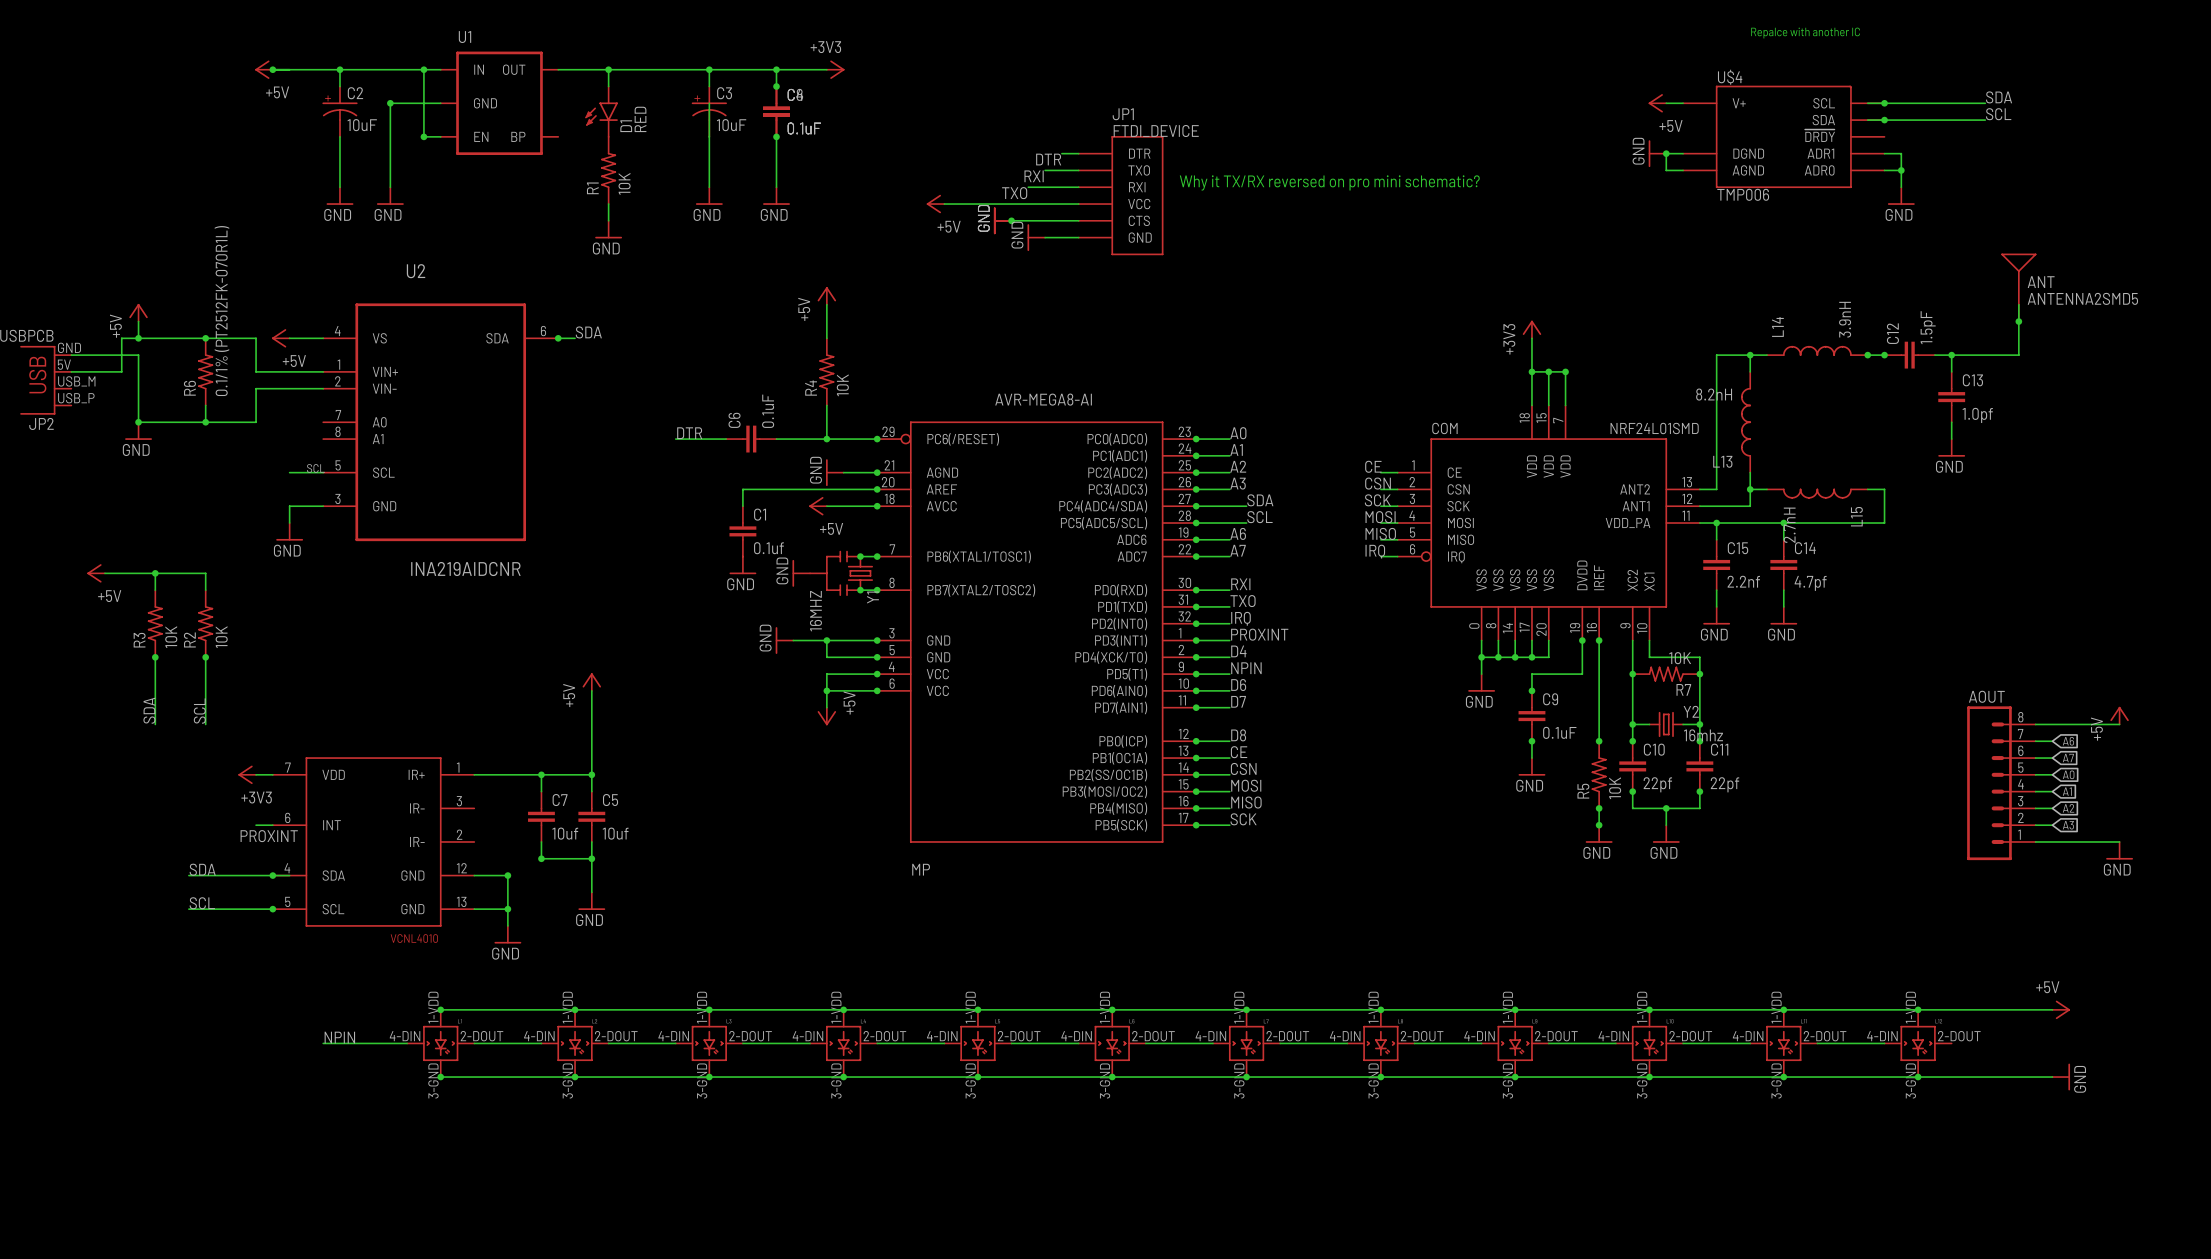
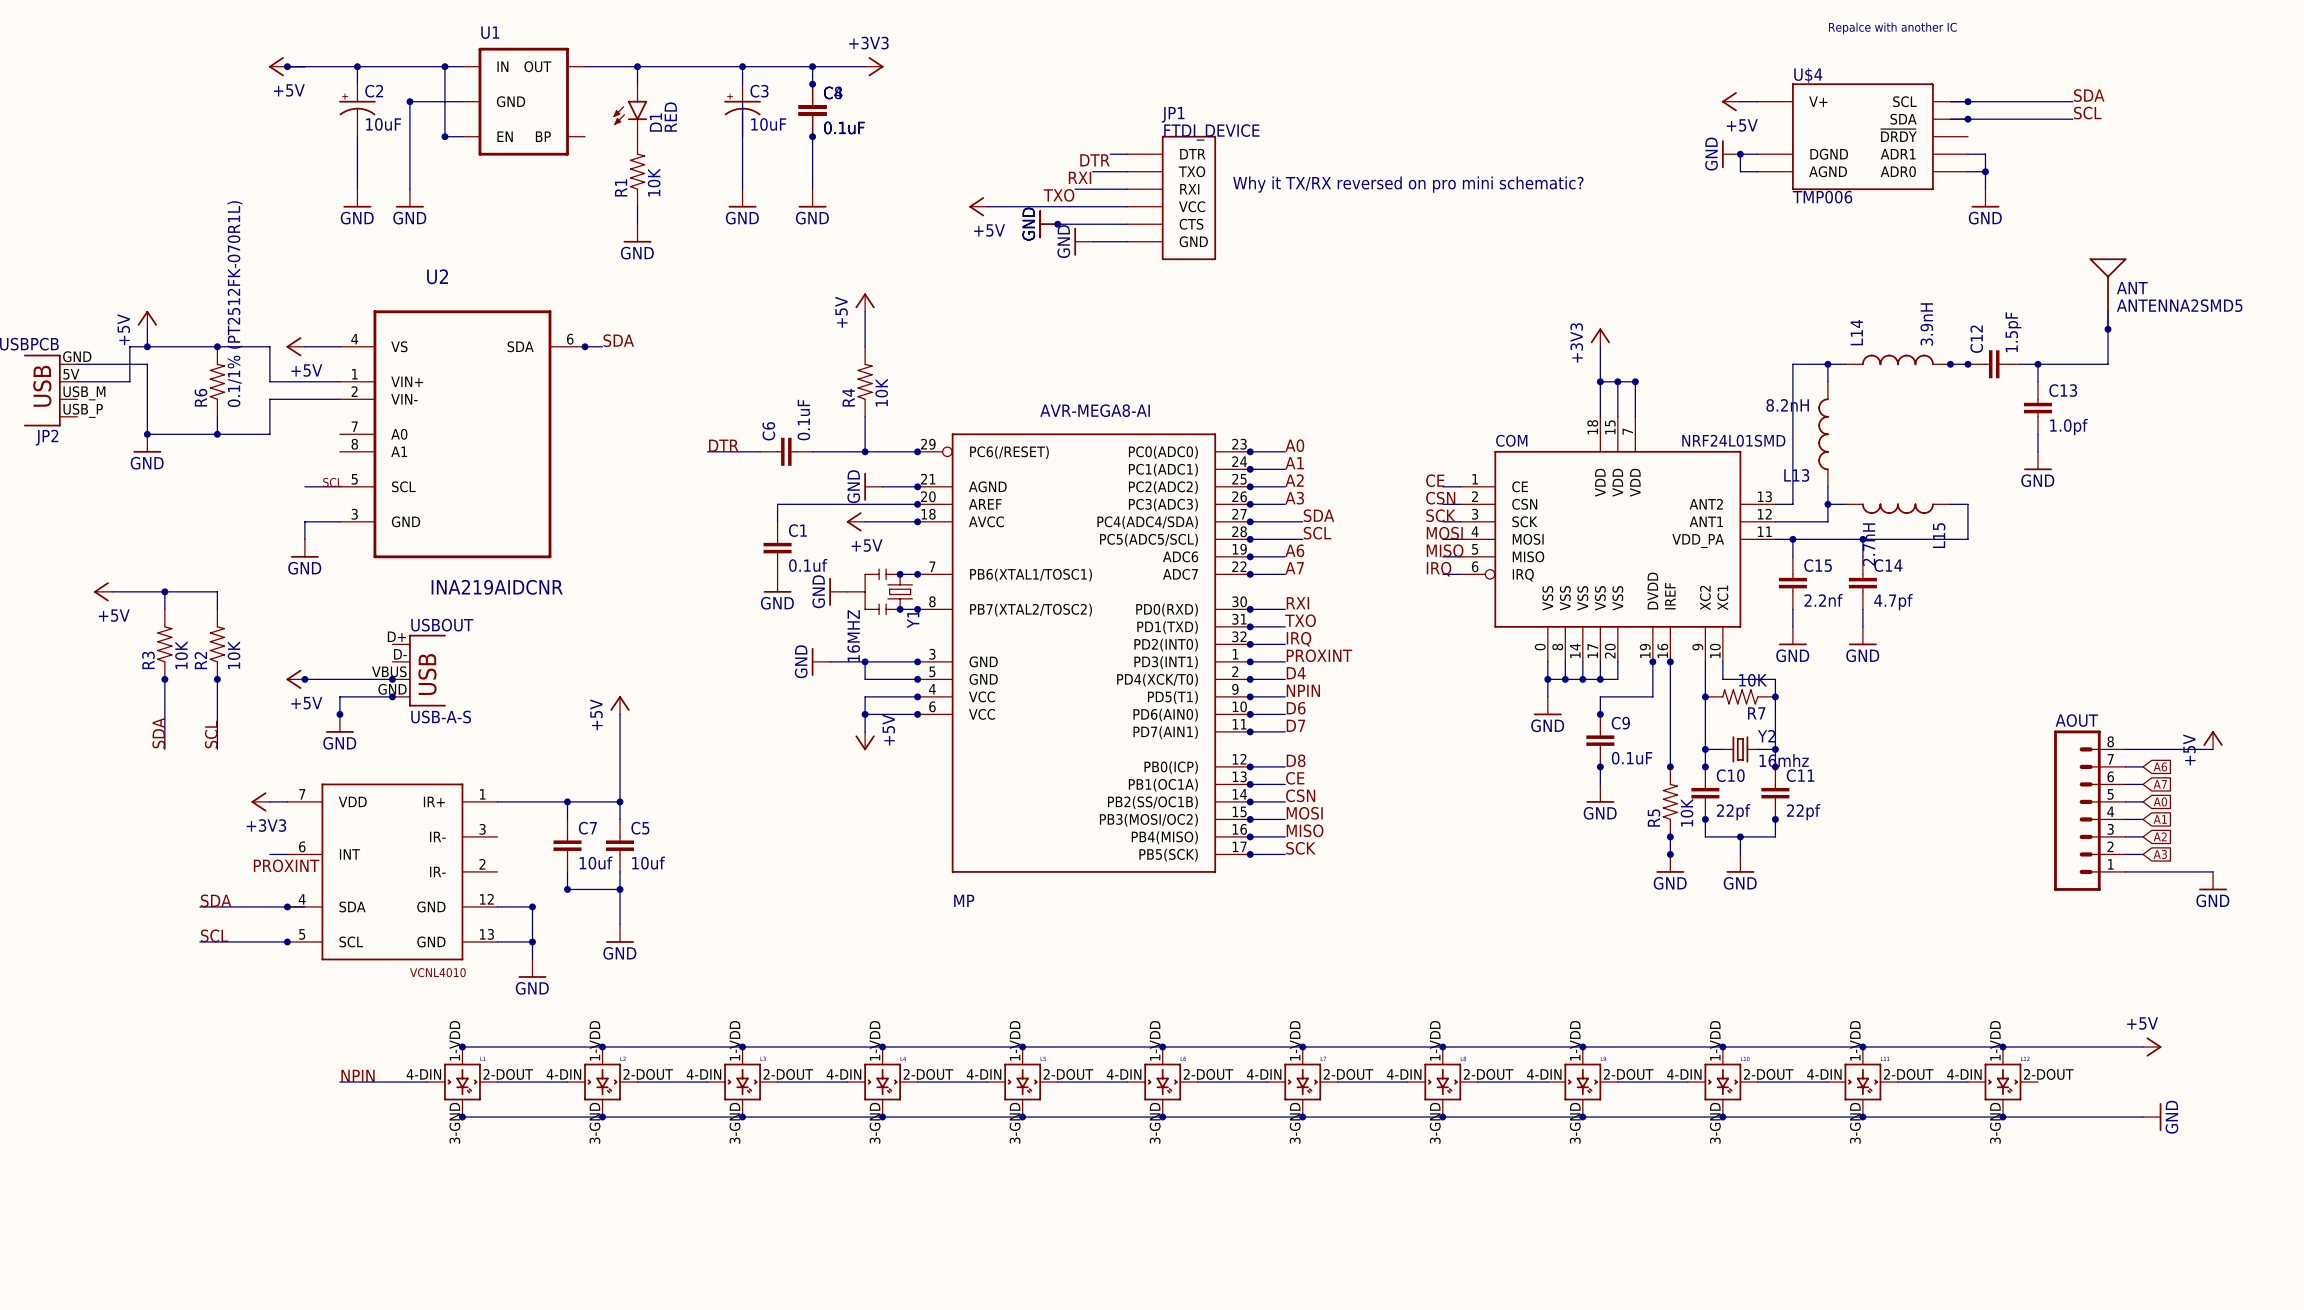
USBOUT: none -> USB-A-S (419, 670)
power symbol: none -> +5V (295, 679)
wire: none -> (304, 679) (392, 679)
junction: none -> (304, 679)
junction: none -> (392, 679)
wire: none -> (392, 696) (339, 696) (339, 714)
junction: none -> (392, 696)
junction: none -> (339, 714)
power symbol: none -> GND (339, 723)

